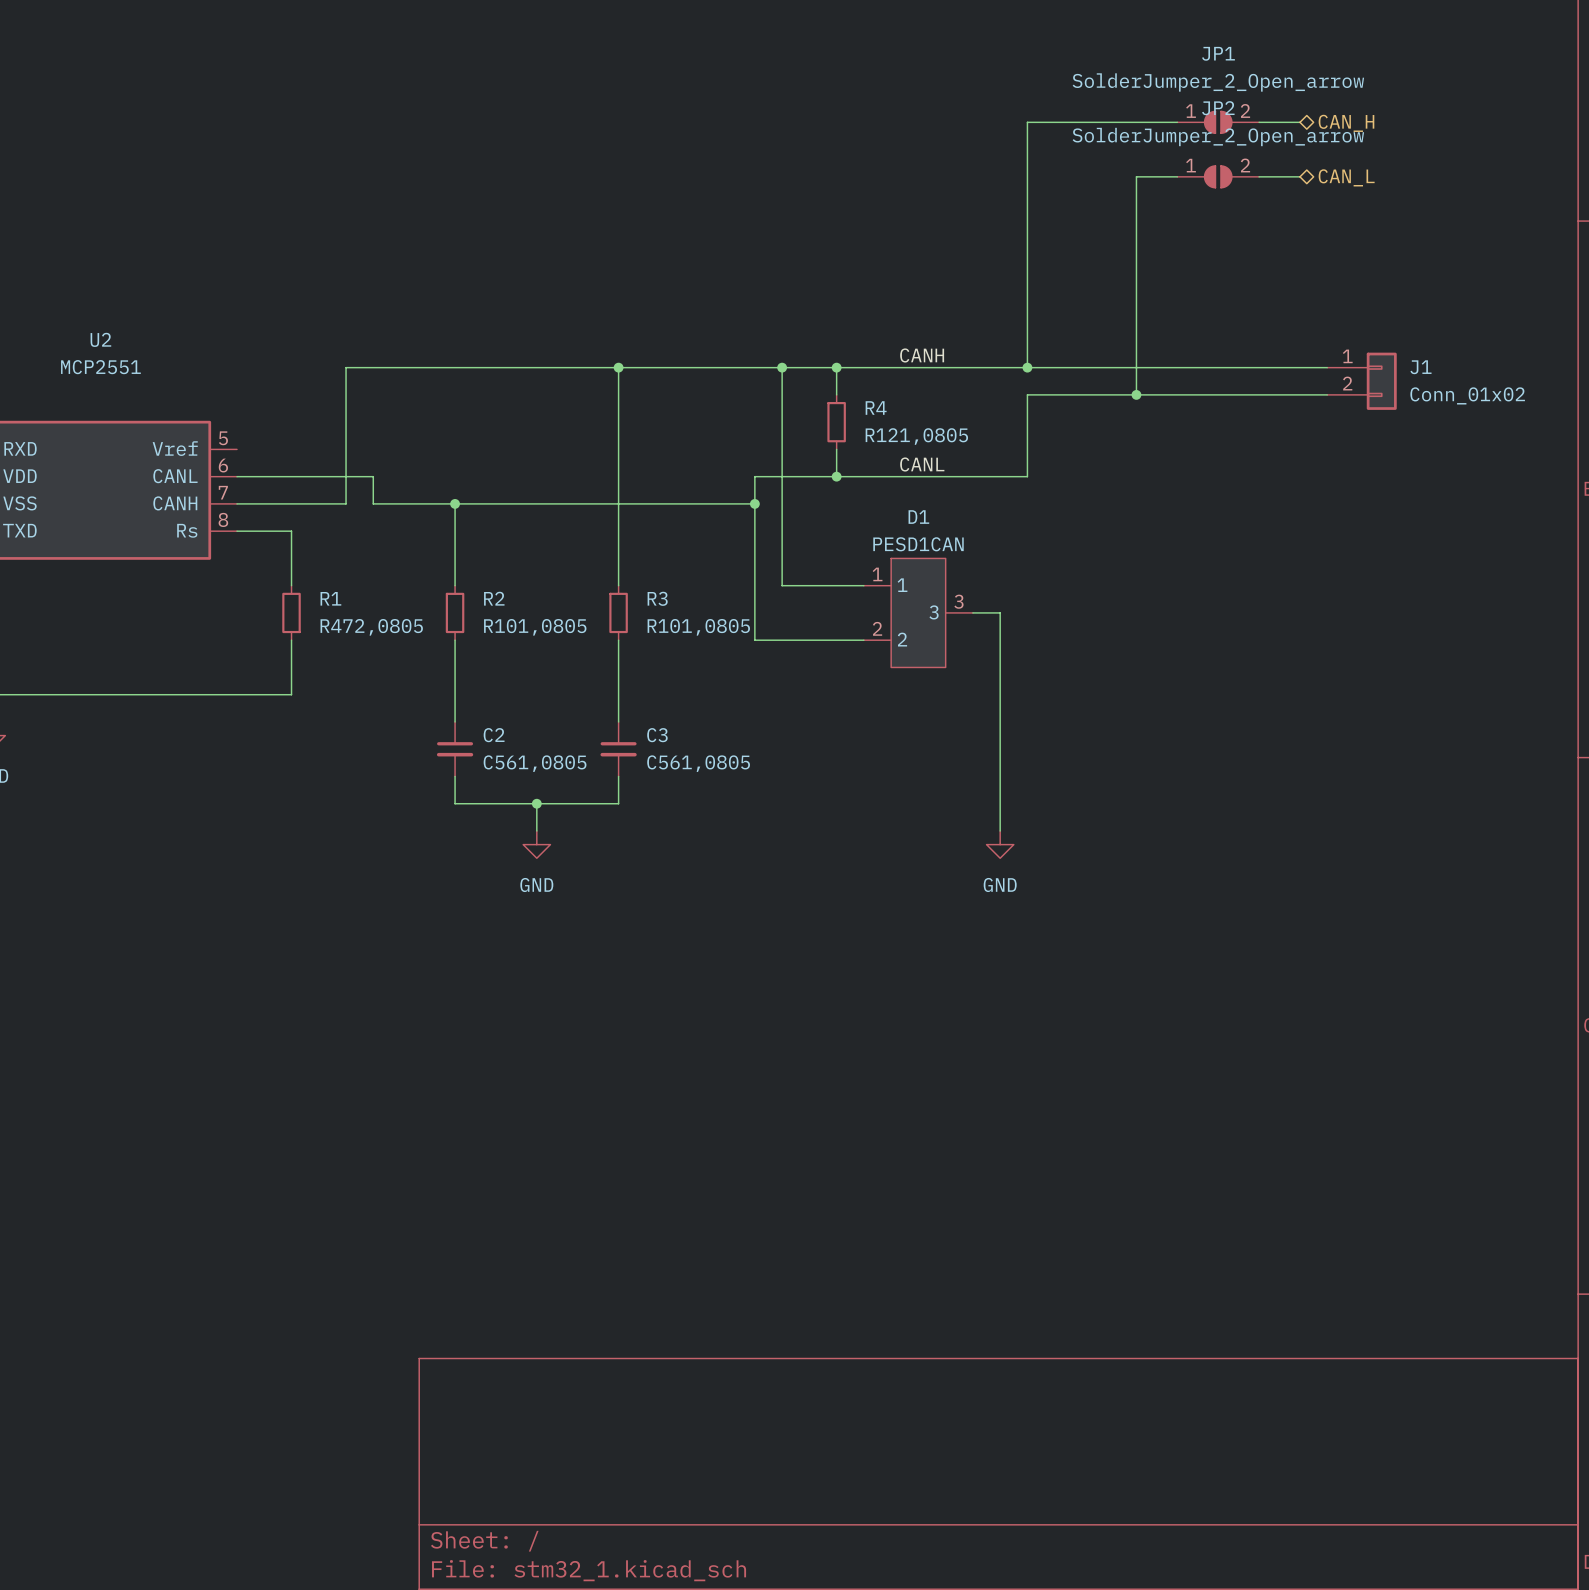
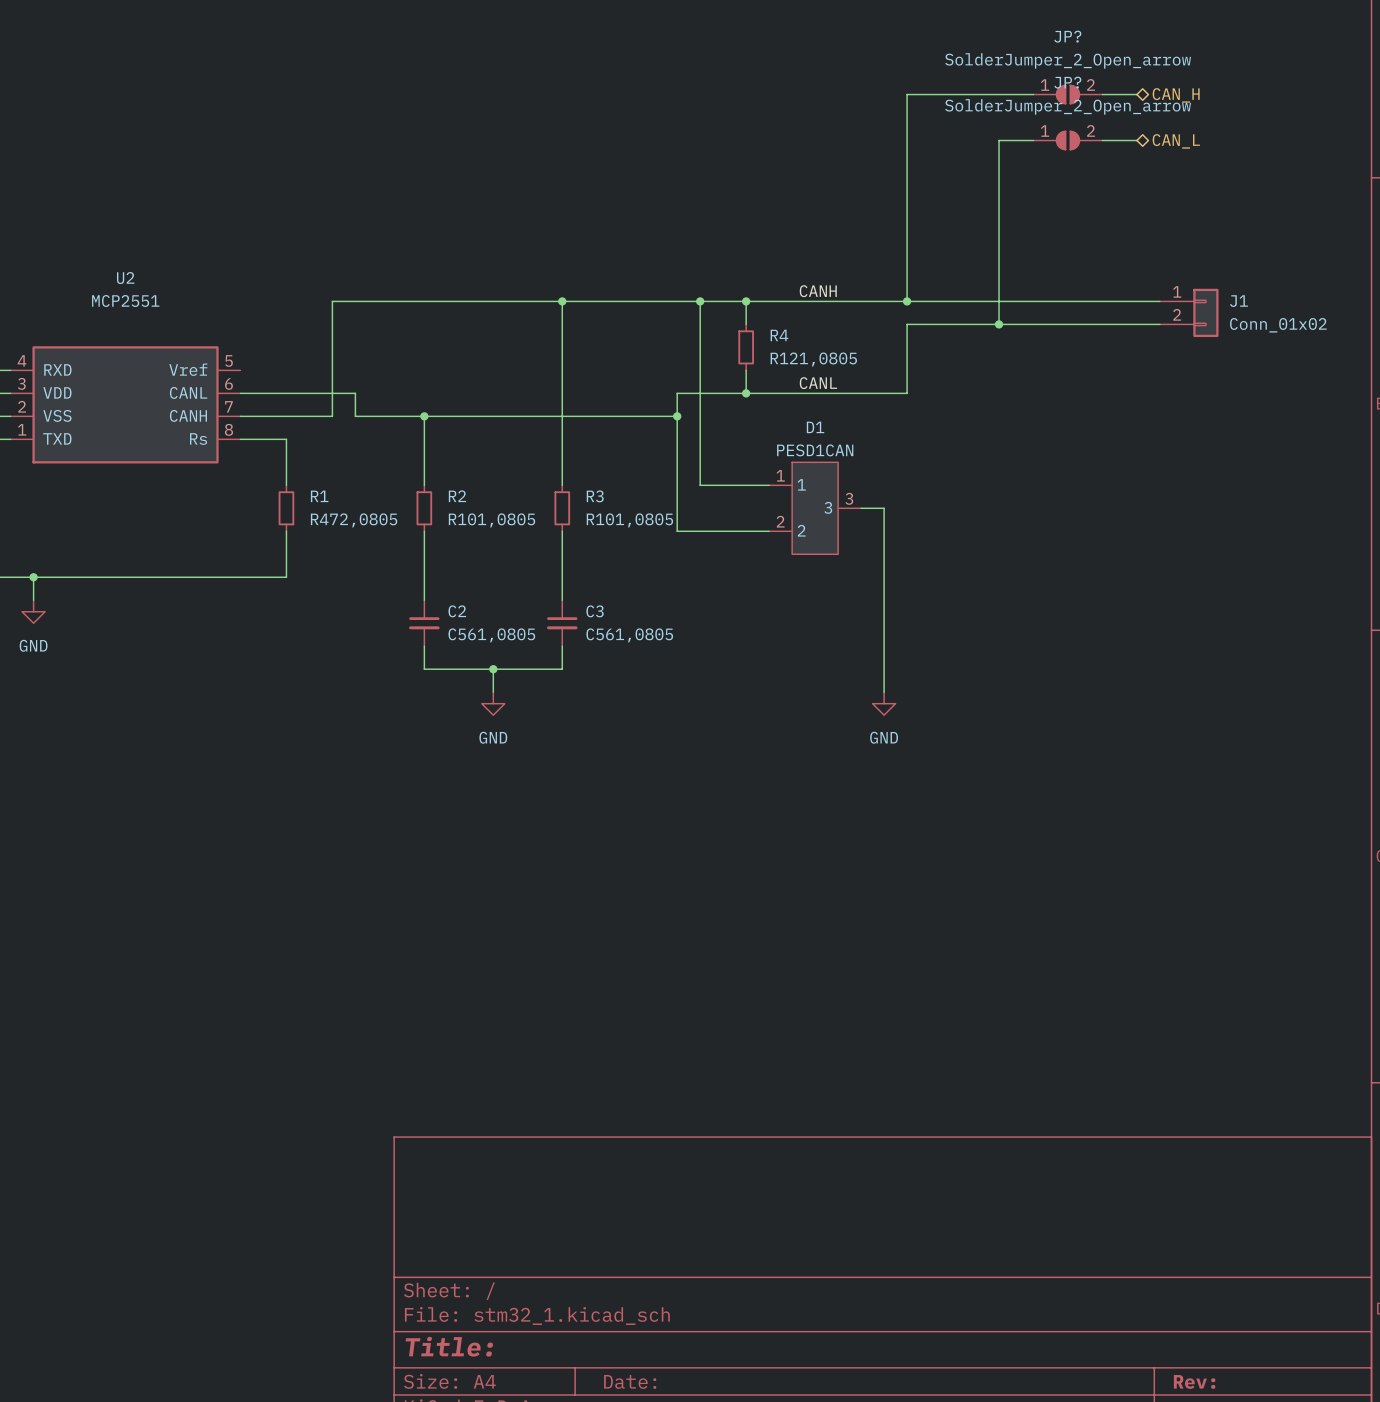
JP1 name: JP1 (1218, 53) -> JP? (1067, 36)
JP2 name: JP2 (1218, 108) -> JP? (1067, 82)

